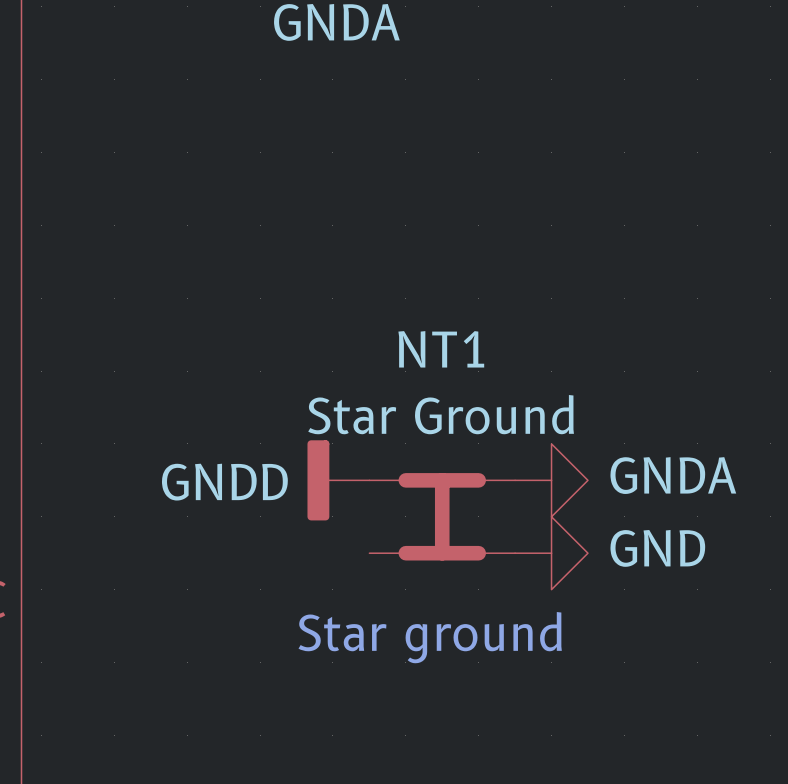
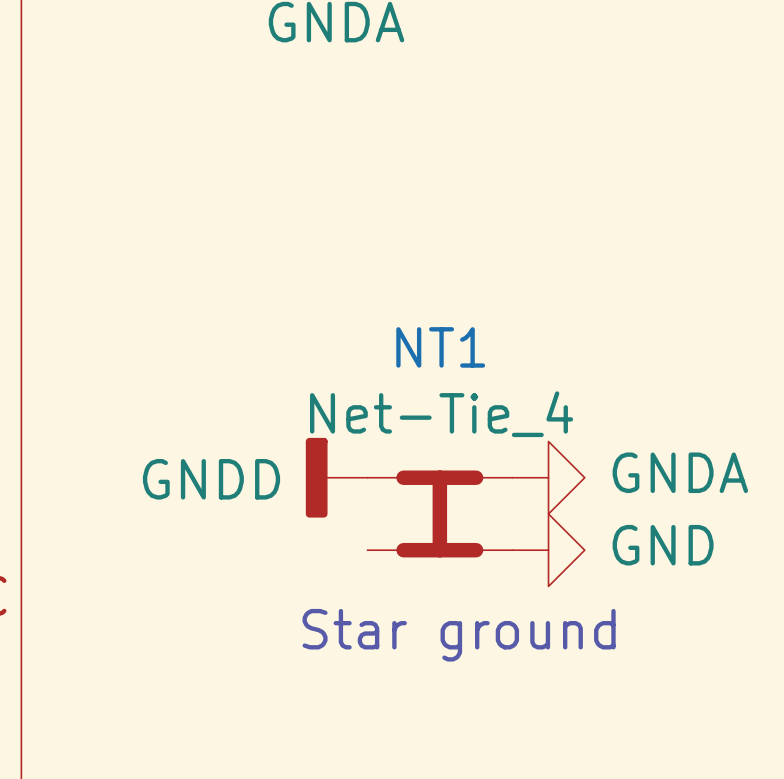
NT1 value: Star Ground (441, 414) -> Net-Tie_4 (441, 414)

